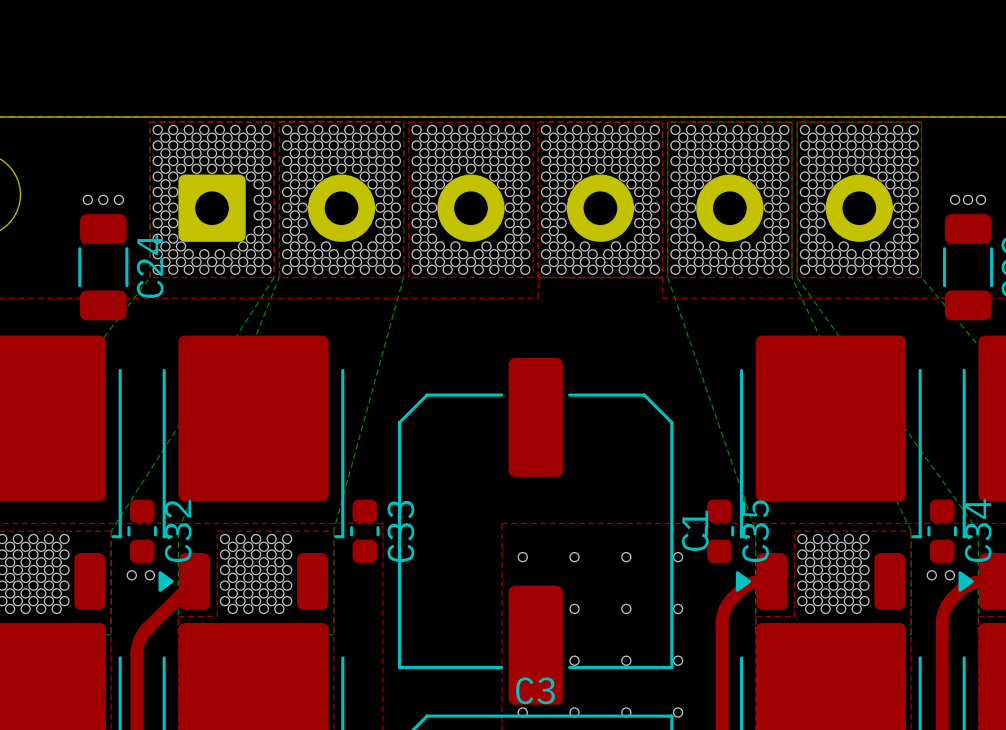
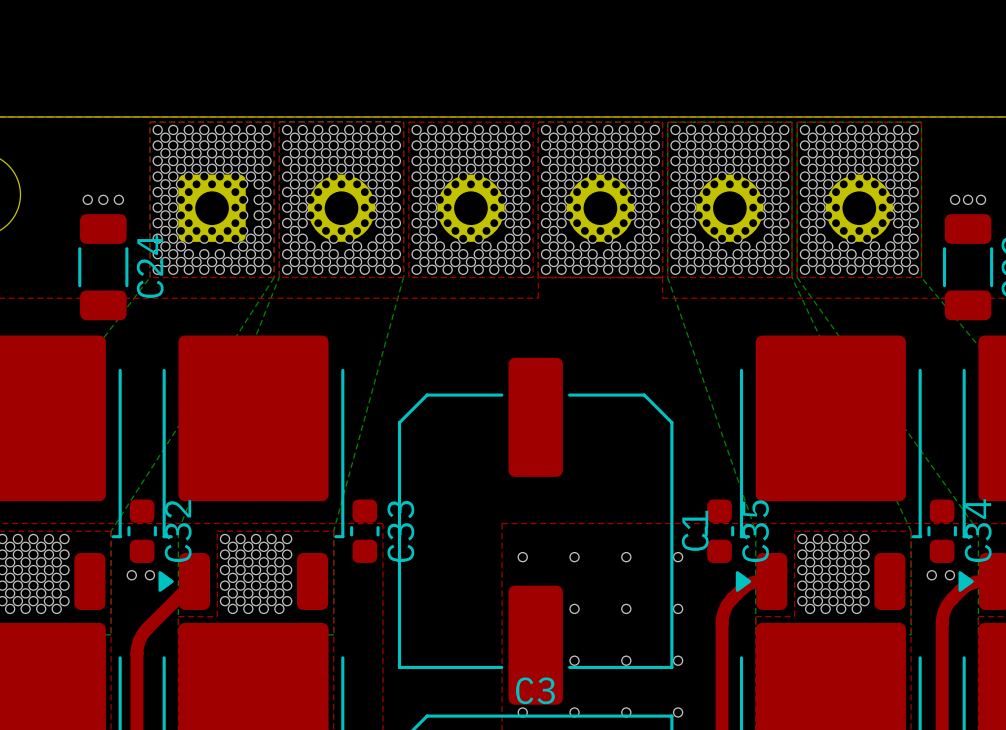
via: none -> (188, 176)
via: none -> (204, 176)
via: none -> (219, 176)
via: none -> (235, 176)
via: none -> (333, 176)
via: none -> (349, 176)
via: none -> (463, 176)
via: none -> (478, 176)
via: none -> (592, 176)
via: none -> (608, 176)
via: none -> (722, 176)
via: none -> (737, 176)
via: none -> (851, 176)
via: none -> (867, 176)
via: none -> (181, 184)
via: none -> (196, 184)
via: none -> (212, 184)
via: none -> (227, 184)
via: none -> (243, 184)
via: none -> (325, 184)
via: none -> (341, 184)
via: none -> (357, 184)
via: none -> (455, 184)
via: none -> (470, 184)
via: none -> (486, 184)
via: none -> (584, 184)
via: none -> (600, 184)
via: none -> (615, 184)
via: none -> (714, 184)
via: none -> (729, 184)
via: none -> (745, 184)
via: none -> (843, 184)
via: none -> (859, 184)
via: none -> (874, 184)
via: none -> (188, 192)
via: none -> (235, 192)
via: none -> (318, 192)
via: none -> (364, 192)
via: none -> (447, 192)
via: none -> (494, 192)
via: none -> (577, 192)
via: none -> (623, 192)
via: none -> (706, 192)
via: none -> (753, 192)
via: none -> (836, 192)
via: none -> (882, 192)
via: none -> (181, 199)
via: none -> (243, 199)
via: none -> (310, 199)
via: none -> (372, 199)
via: none -> (439, 199)
via: none -> (502, 199)
via: none -> (569, 199)
via: none -> (631, 199)
via: none -> (698, 199)
via: none -> (760, 199)
via: none -> (828, 199)
via: none -> (890, 199)
via: none -> (188, 207)
via: none -> (235, 207)
via: none -> (318, 207)
via: none -> (364, 207)
via: none -> (447, 207)
via: none -> (494, 207)
via: none -> (577, 207)
via: none -> (623, 207)
via: none -> (706, 207)
via: none -> (753, 207)
via: none -> (836, 207)
via: none -> (882, 207)
via: none -> (181, 215)
via: none -> (243, 215)
via: none -> (310, 215)
via: none -> (372, 215)
via: none -> (439, 215)
via: none -> (502, 215)
via: none -> (569, 215)
via: none -> (631, 215)
via: none -> (698, 215)
via: none -> (760, 215)
via: none -> (828, 215)
via: none -> (890, 215)
via: none -> (188, 223)
via: none -> (235, 223)
via: none -> (318, 223)
via: none -> (364, 223)
via: none -> (447, 223)
via: none -> (494, 223)
via: none -> (577, 223)
via: none -> (623, 223)
via: none -> (706, 223)
via: none -> (753, 223)
via: none -> (836, 223)
via: none -> (882, 223)
via: none -> (181, 230)
via: none -> (196, 230)
via: none -> (212, 230)
via: none -> (227, 230)
via: none -> (243, 230)
via: none -> (325, 230)
via: none -> (341, 230)
via: none -> (357, 230)
via: none -> (455, 230)
via: none -> (470, 230)
via: none -> (486, 230)
via: none -> (584, 230)
via: none -> (600, 230)
via: none -> (615, 230)
via: none -> (714, 230)
via: none -> (729, 230)
via: none -> (745, 230)
via: none -> (843, 230)
via: none -> (859, 230)
via: none -> (874, 230)
via: none -> (188, 238)
via: none -> (204, 238)
via: none -> (219, 238)
via: none -> (235, 238)
via: none -> (333, 238)
via: none -> (349, 238)
via: none -> (463, 238)
via: none -> (478, 238)
via: none -> (592, 238)
via: none -> (608, 238)
via: none -> (722, 238)
via: none -> (737, 238)
via: none -> (851, 238)
via: none -> (867, 238)

